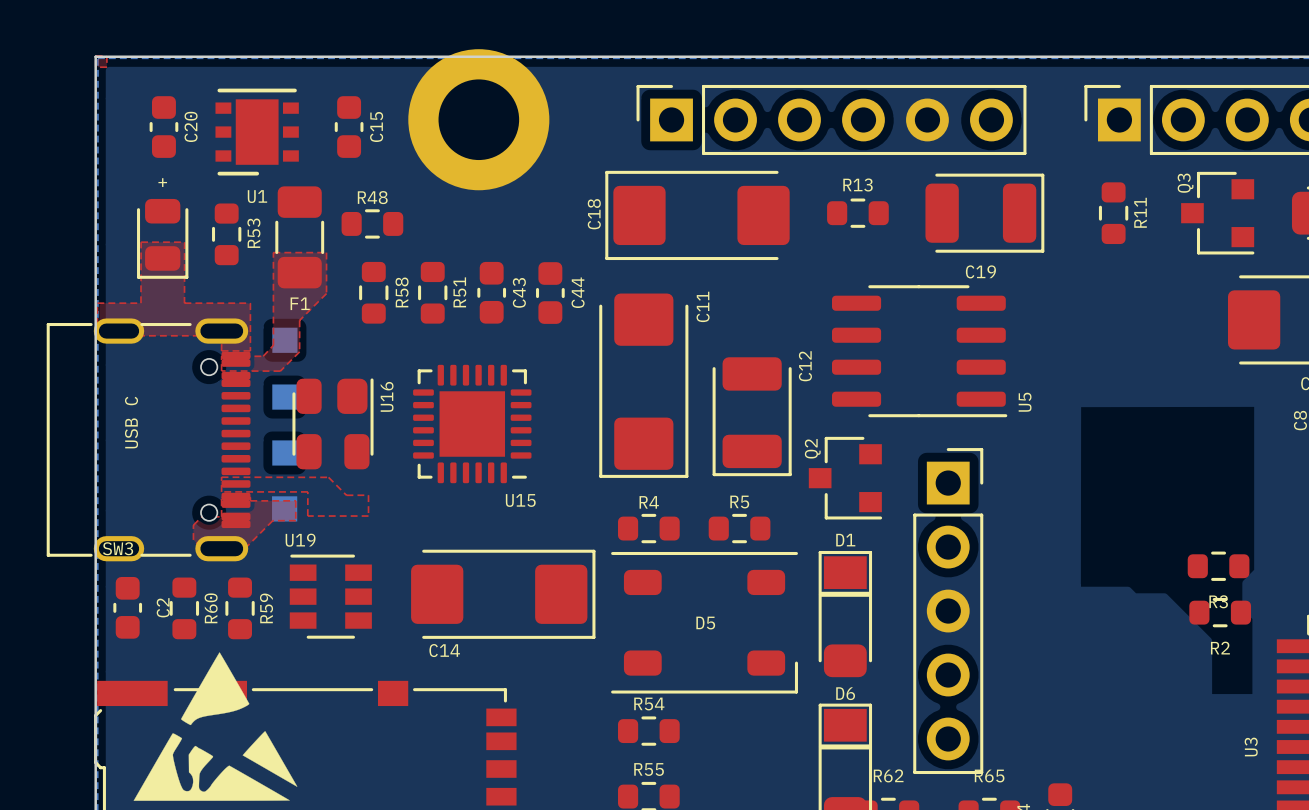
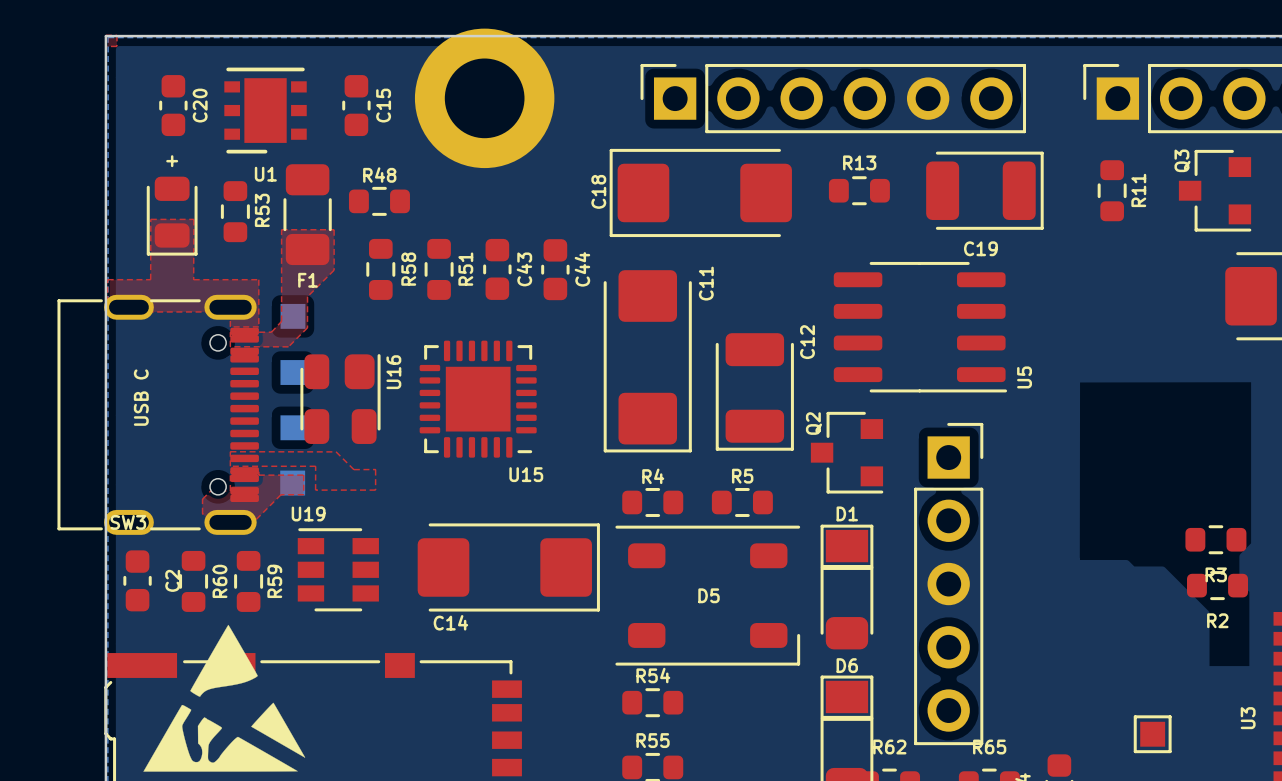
part: none -> (1152, 734)

